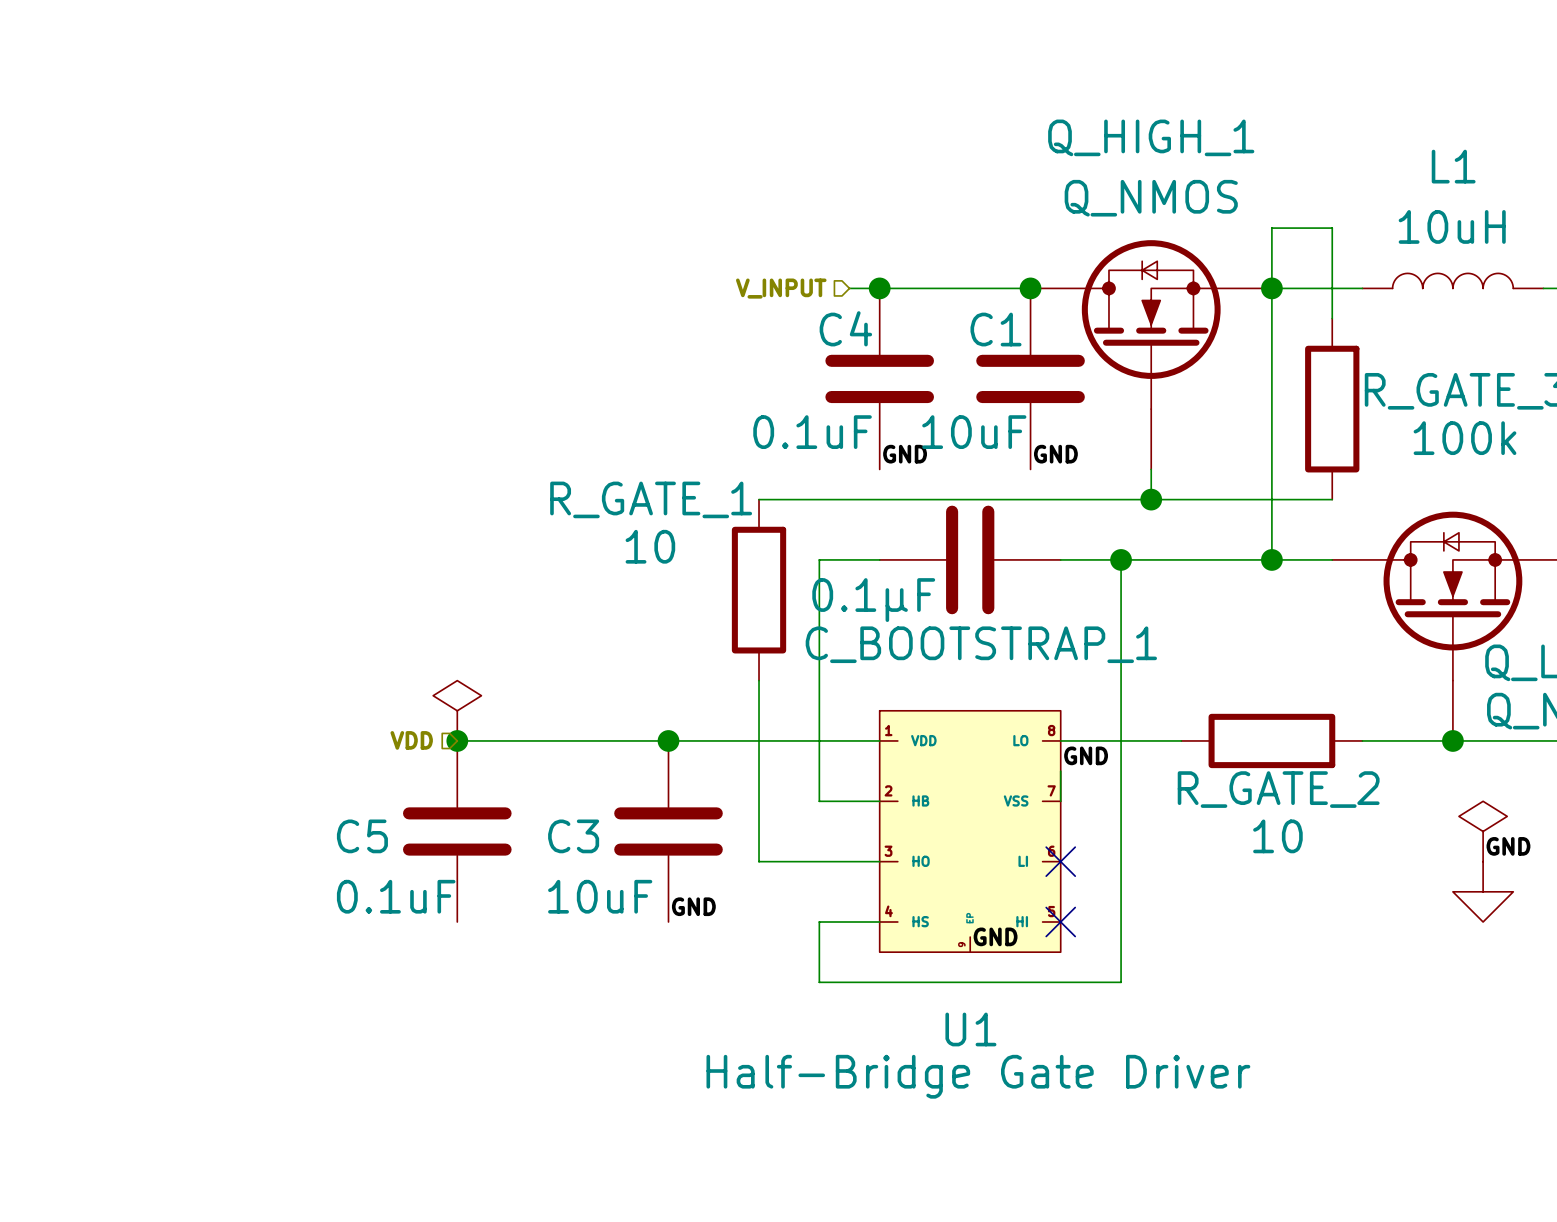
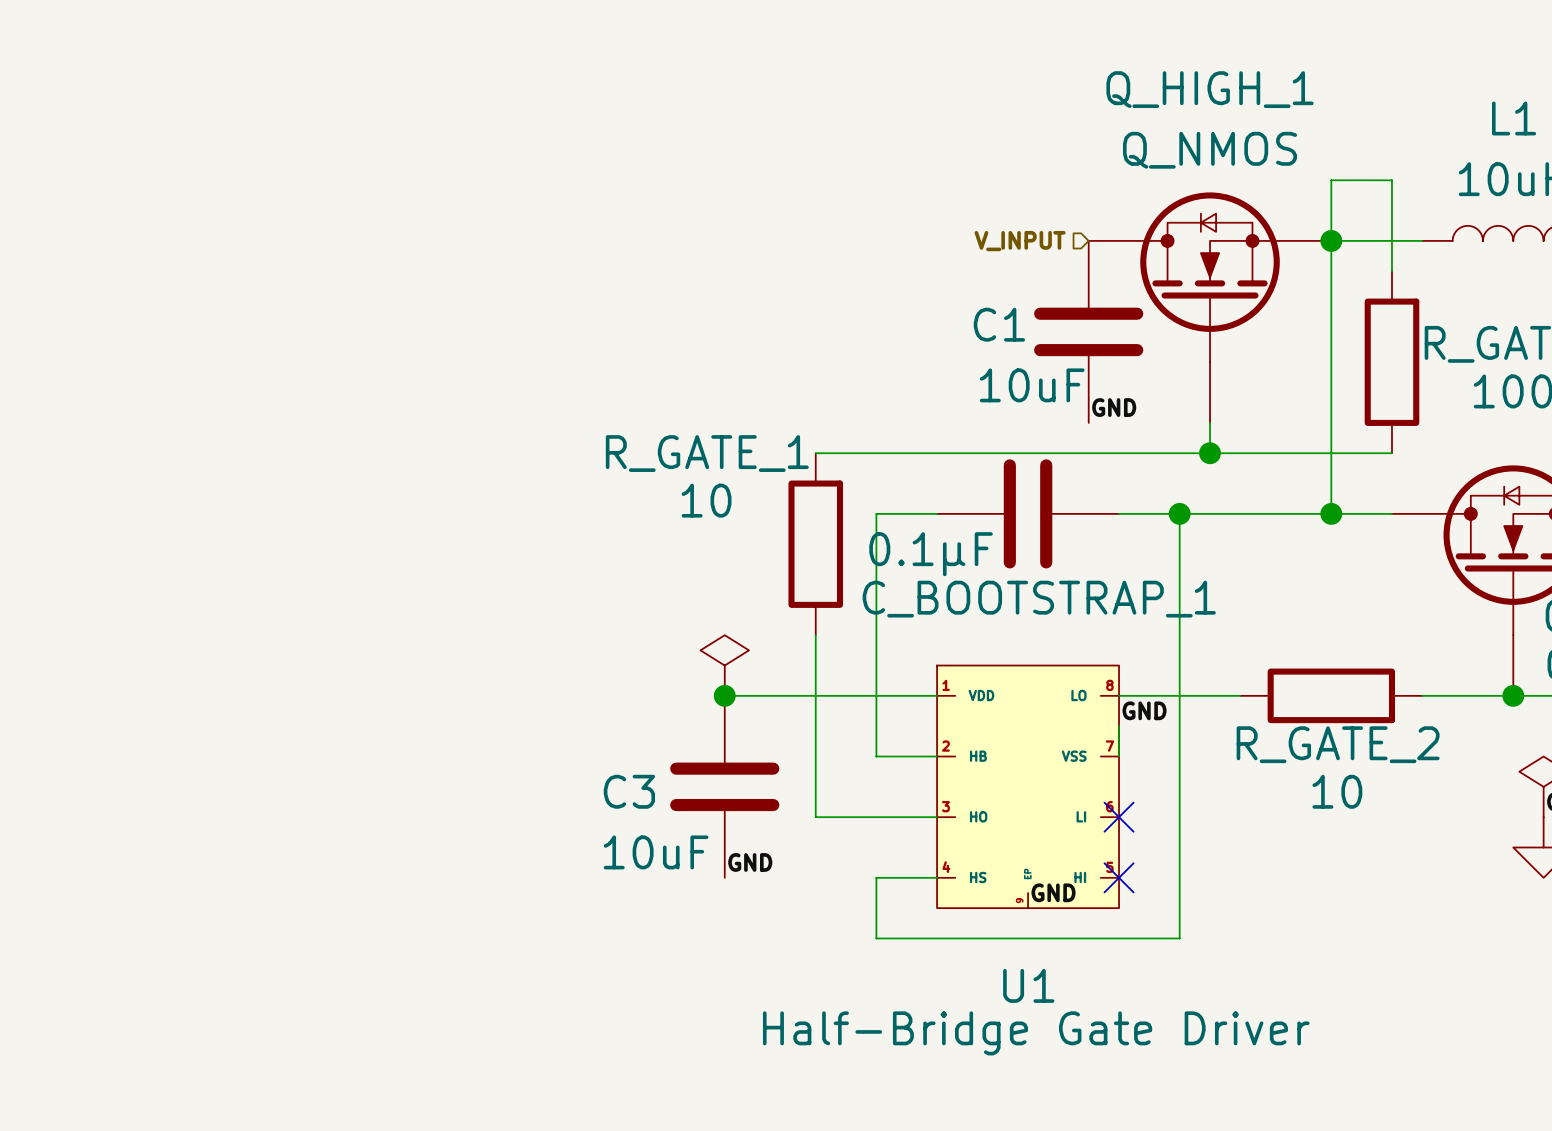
hierarchical label position: V_INPUT (781, 288) -> V_INPUT (1020, 241)
wire: (849, 288) (1030, 288) -> none
junction: (879, 288) -> none
junction: (1030, 288) -> none
C1 name position: C1 (996, 329) -> C1 (999, 324)
C4: 0.1uF (879, 378) -> none
label: GND (905, 454) -> none
power symbol position: (457, 710) -> (724, 665)
hierarchical label: VDD (411, 740) -> none
wire: (457, 740) (668, 740) -> none
junction: (457, 740) -> none
C5: 0.1uF (457, 831) -> none

